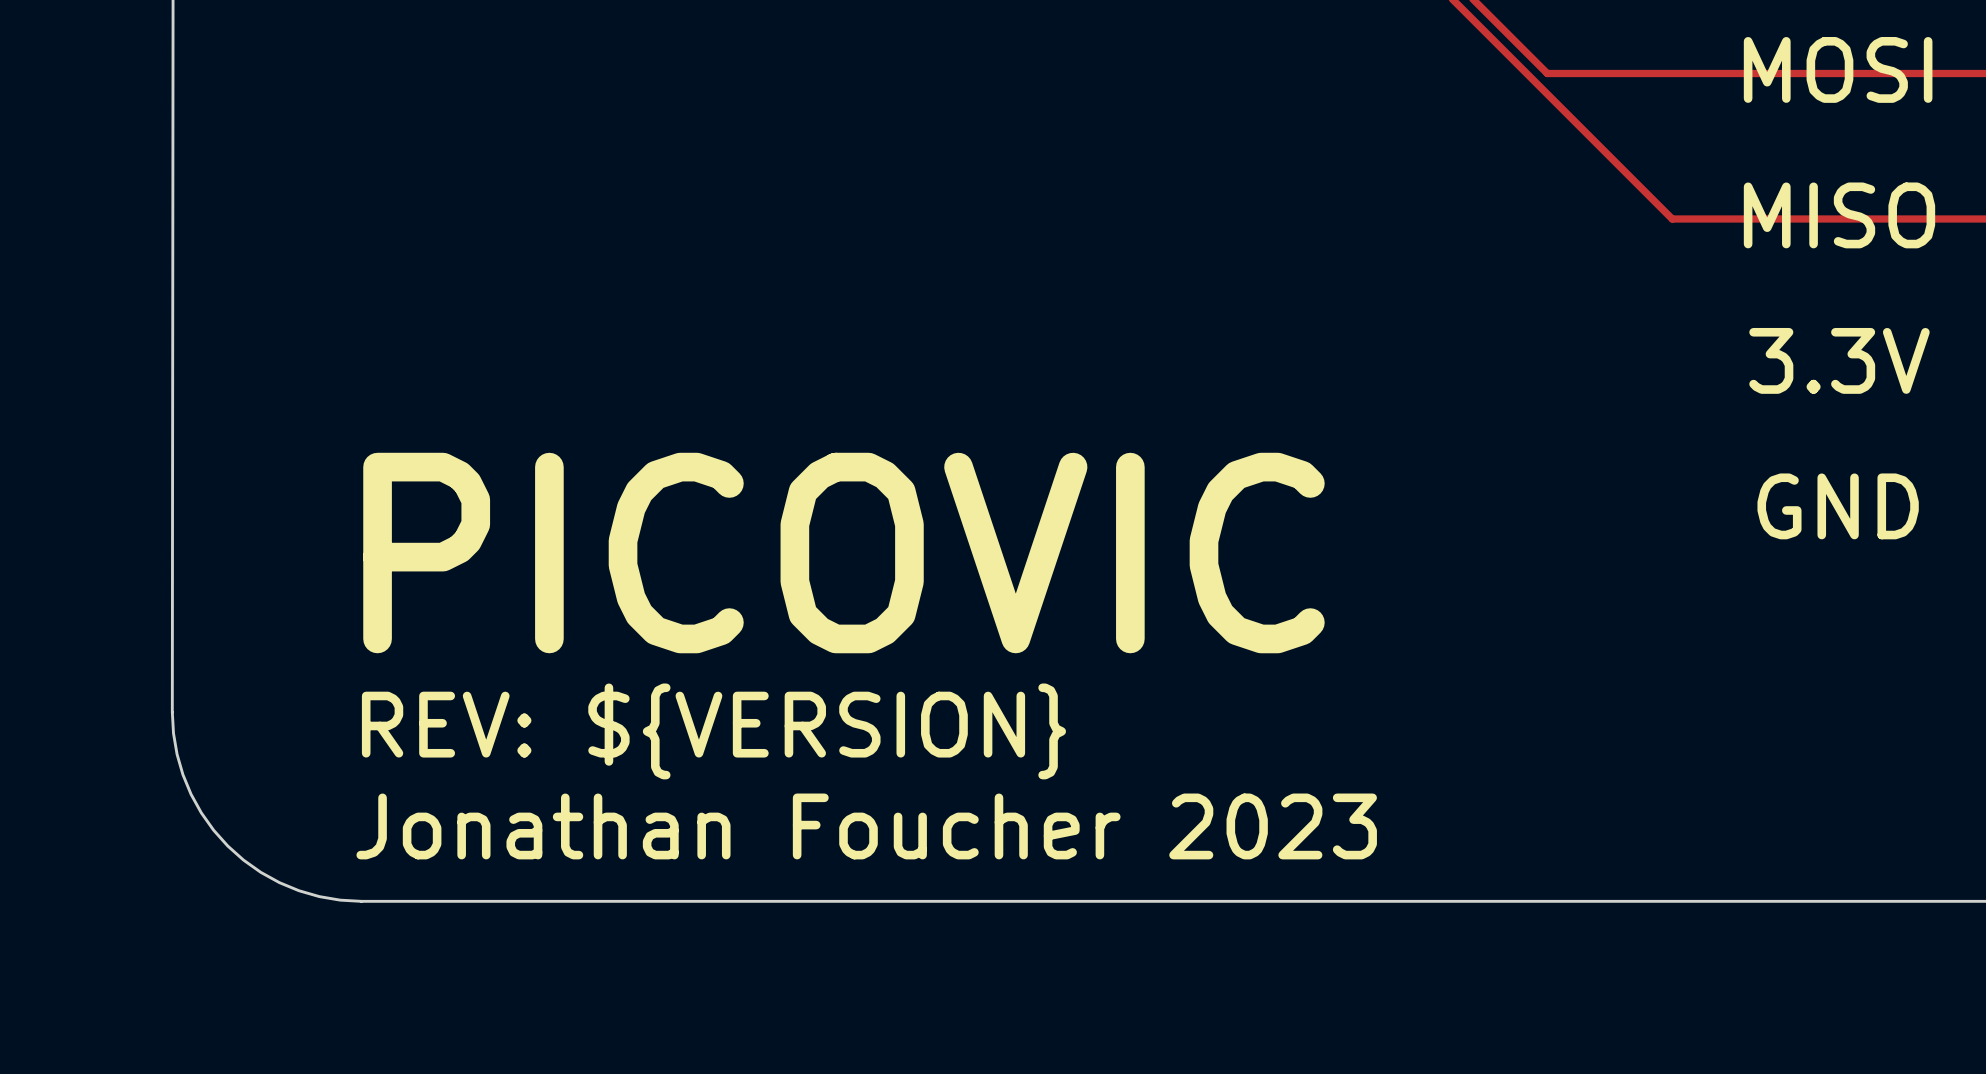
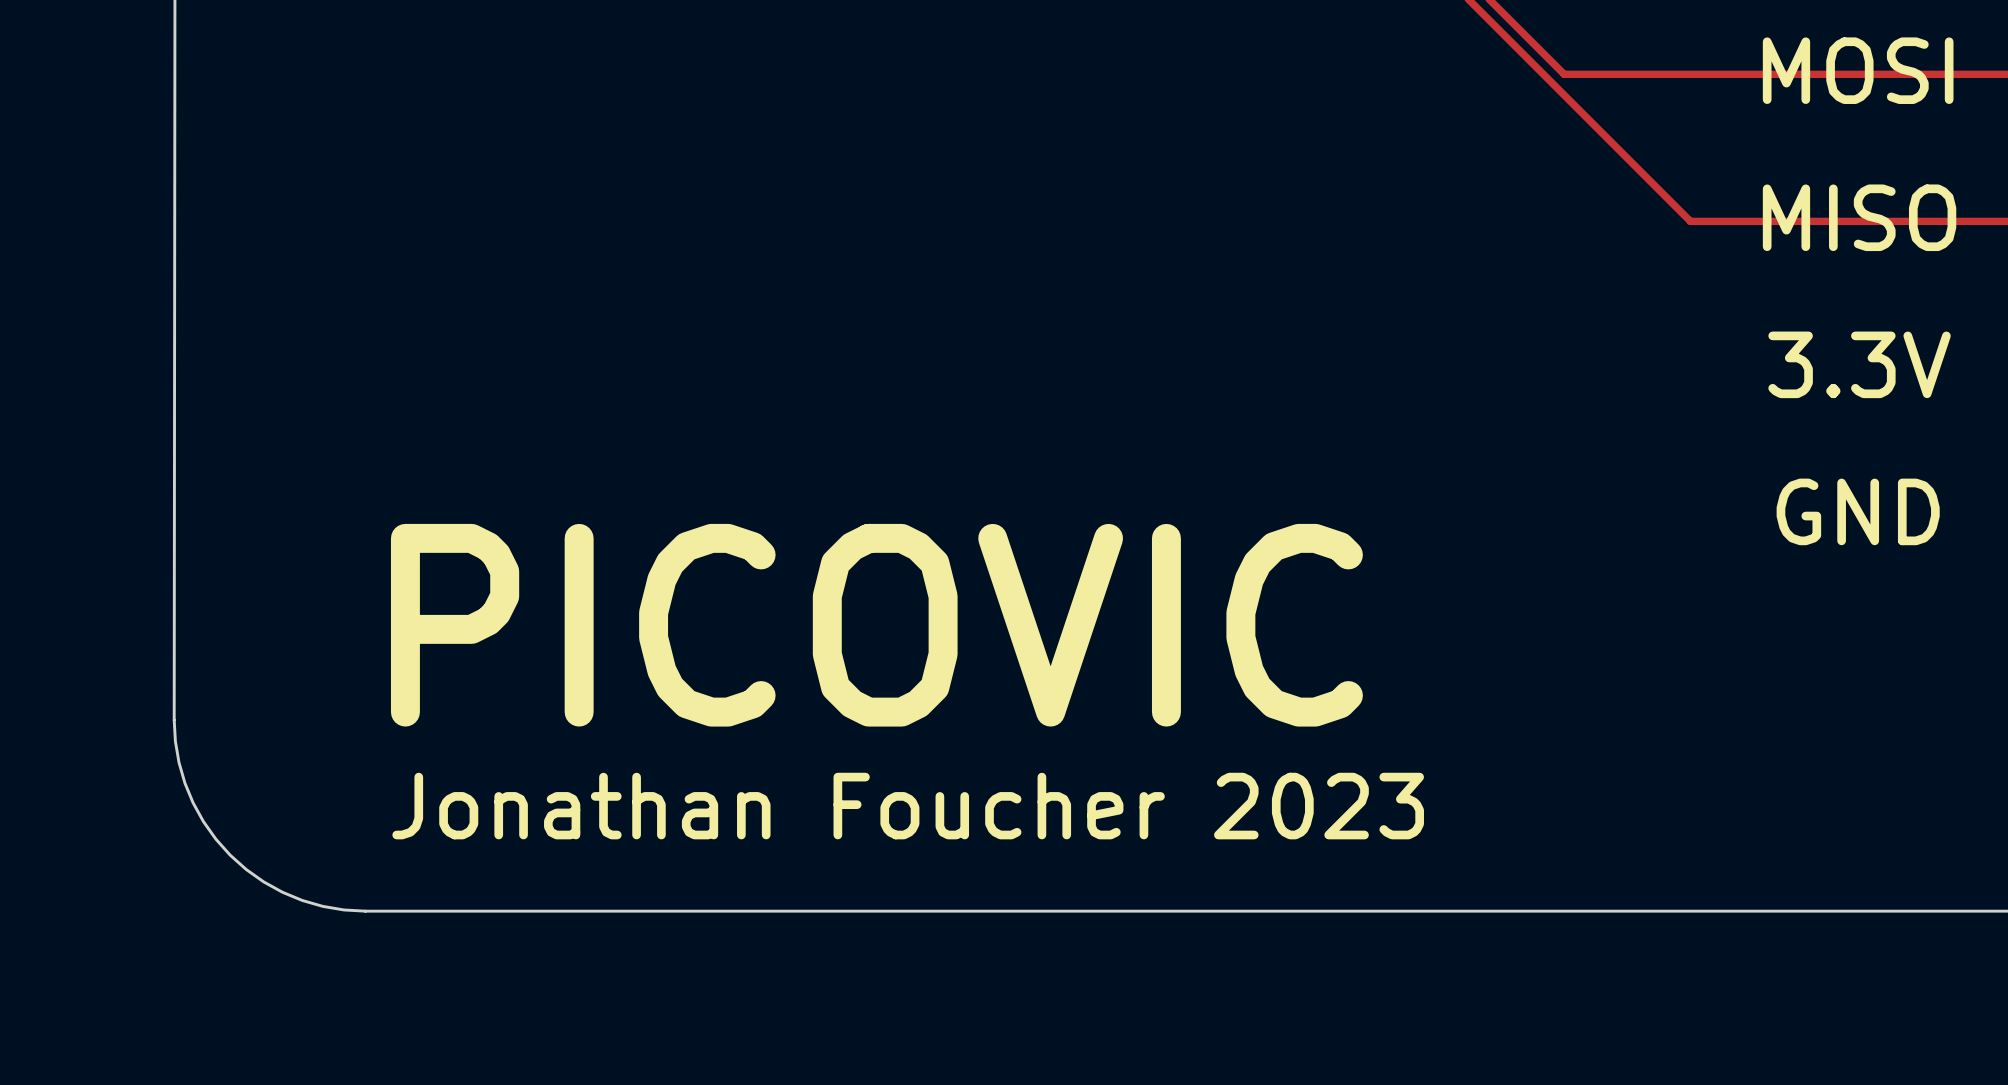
text position: PICOVIC (843, 553) -> PICOVIC (876, 625)
text: REV: ${VERSION} (713, 731) -> none
text position: Jonathan Foucher 2023 (866, 826) -> Jonathan Foucher 2023 (908, 806)

